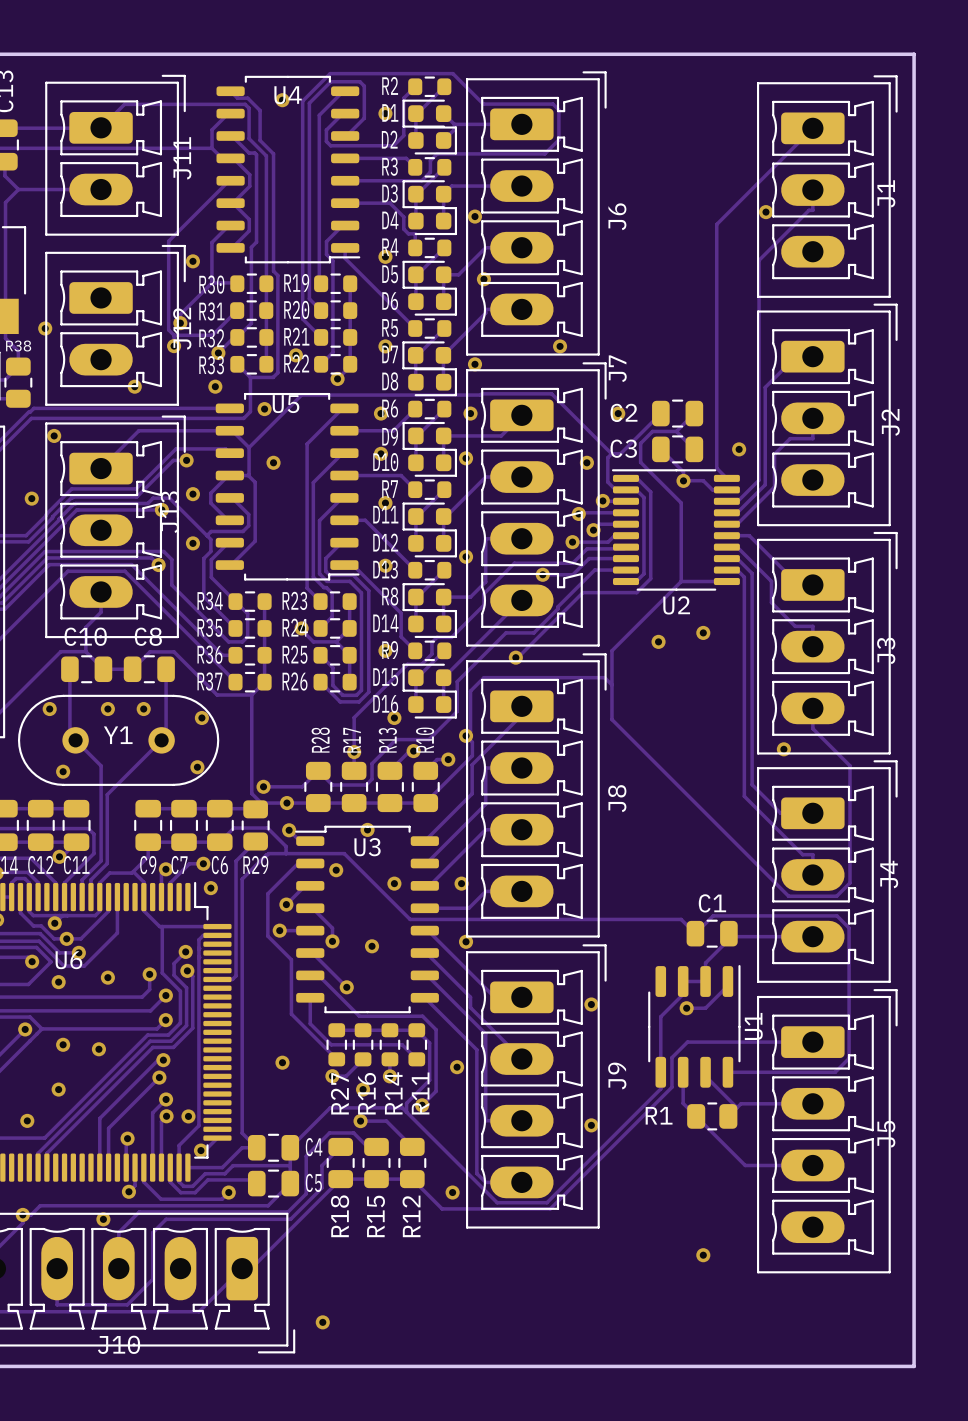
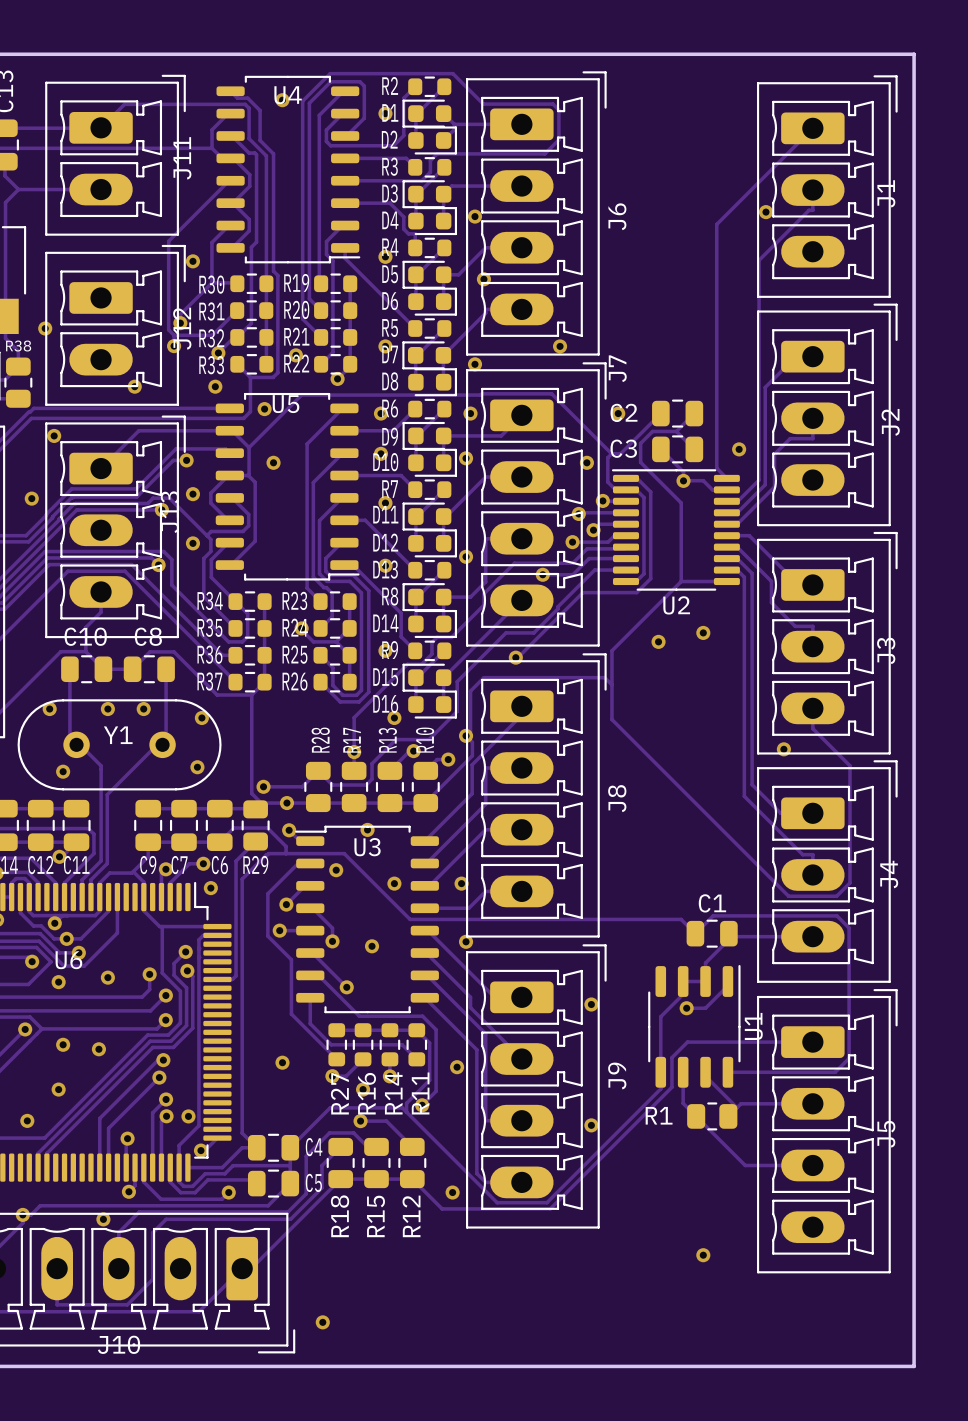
Y1 footprint: [17, 694, 220, 786] -> [17, 699, 222, 791]

